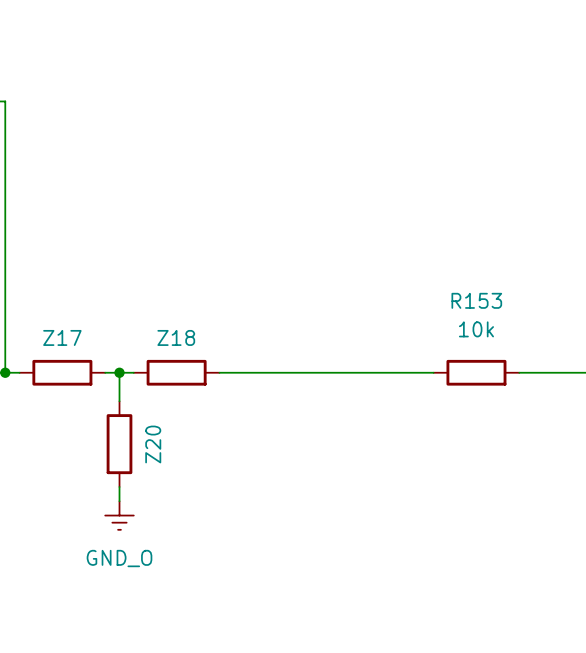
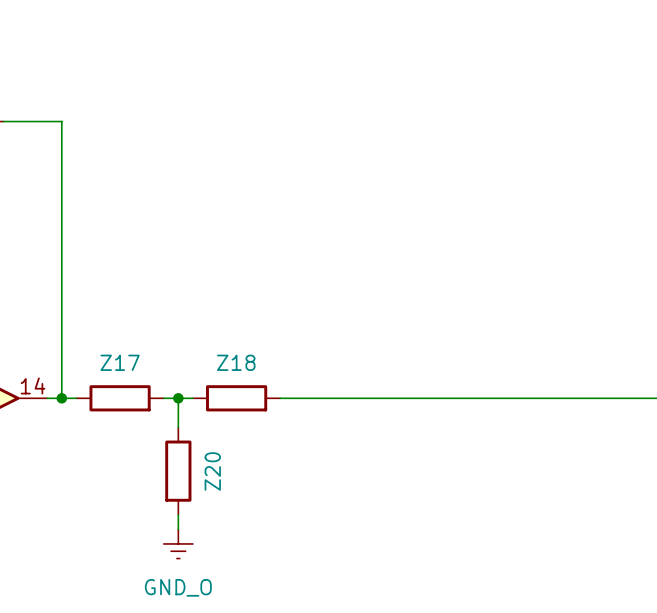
wire: none -> (498, 398) (586, 398)
R153: 10k (476, 372) -> none

